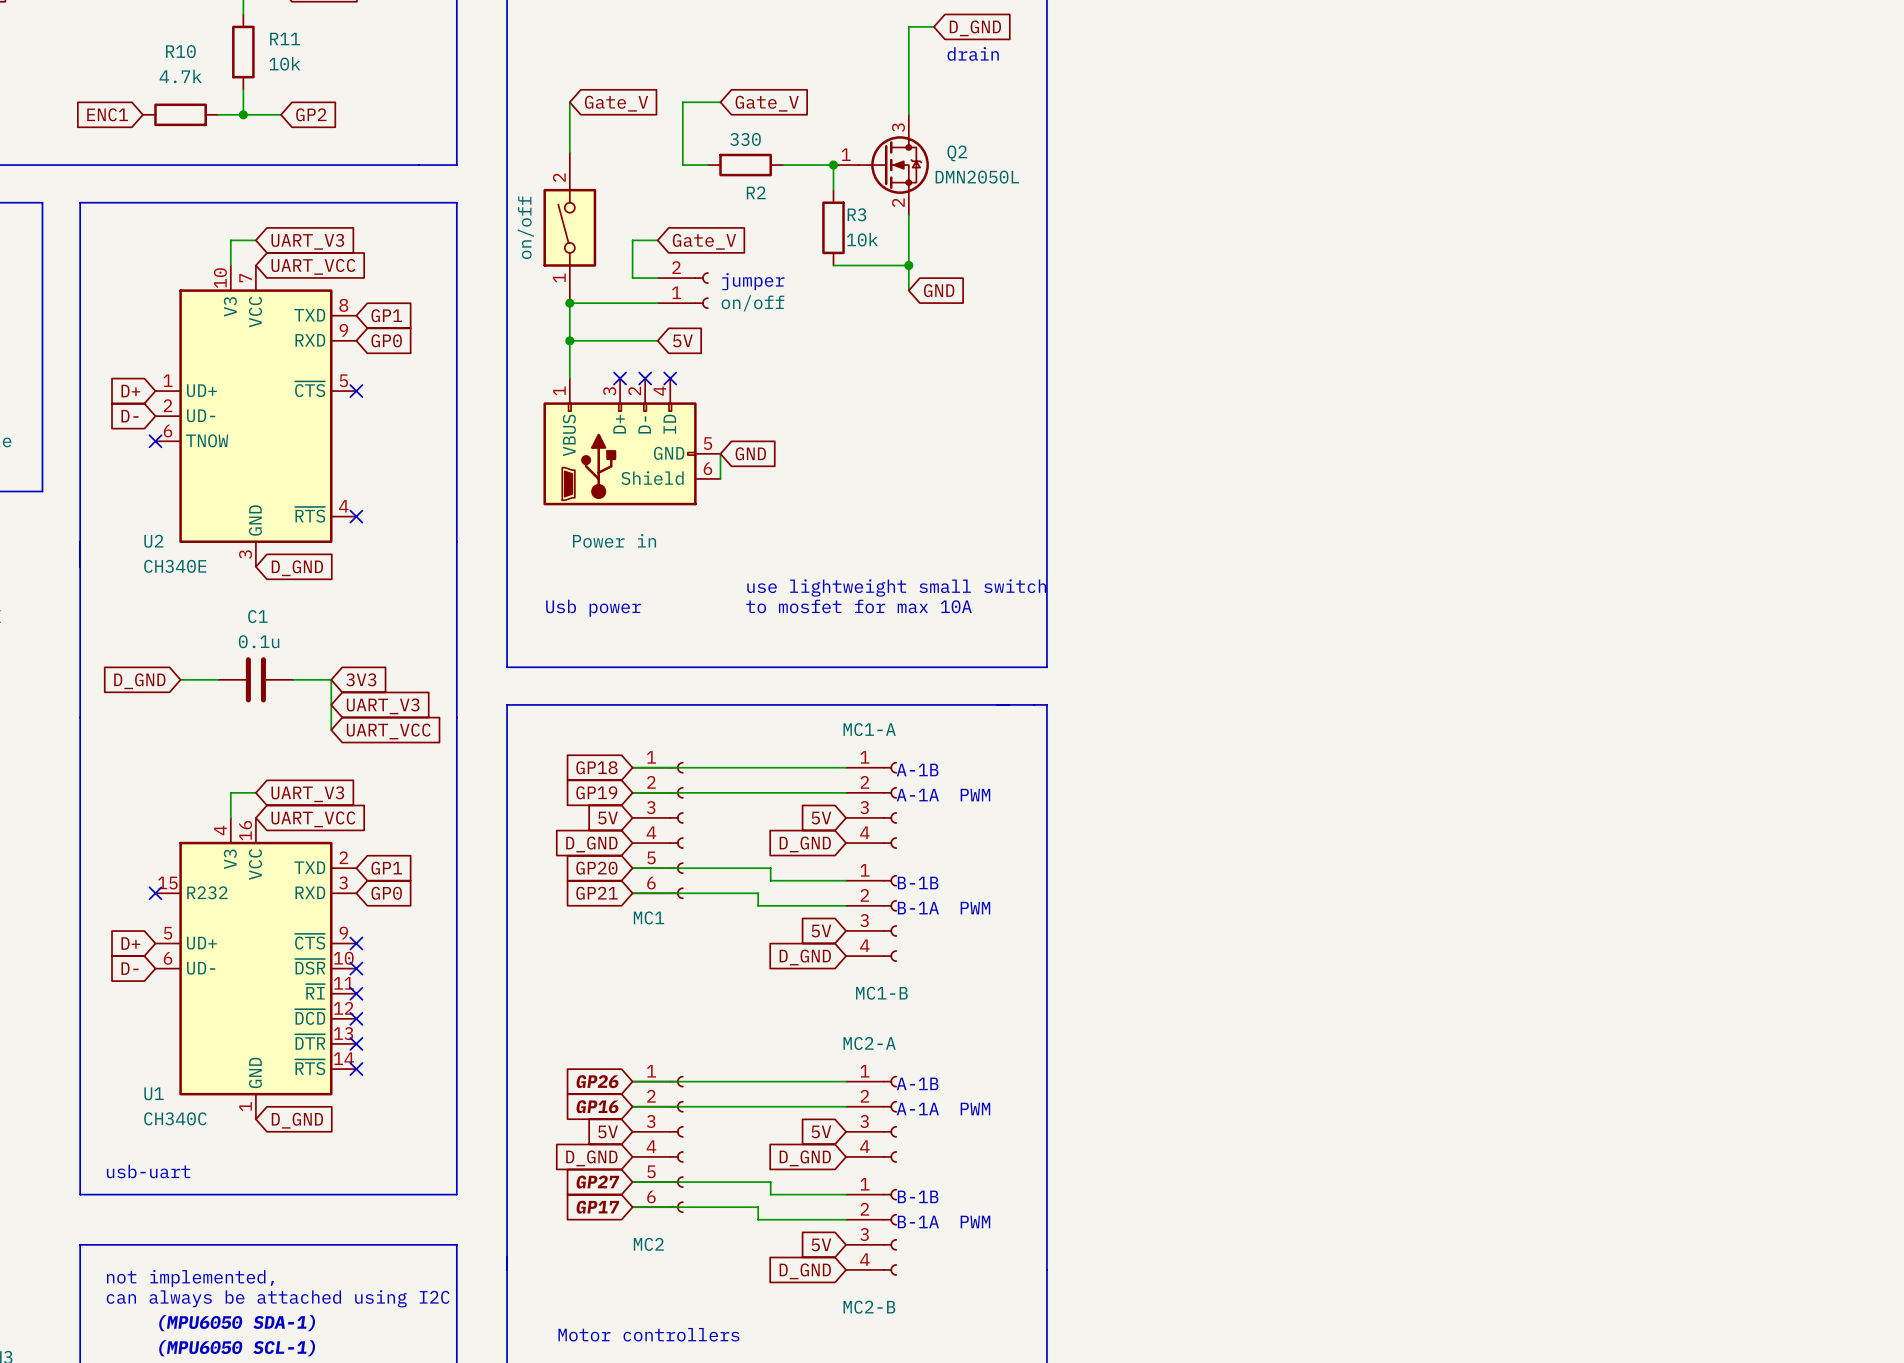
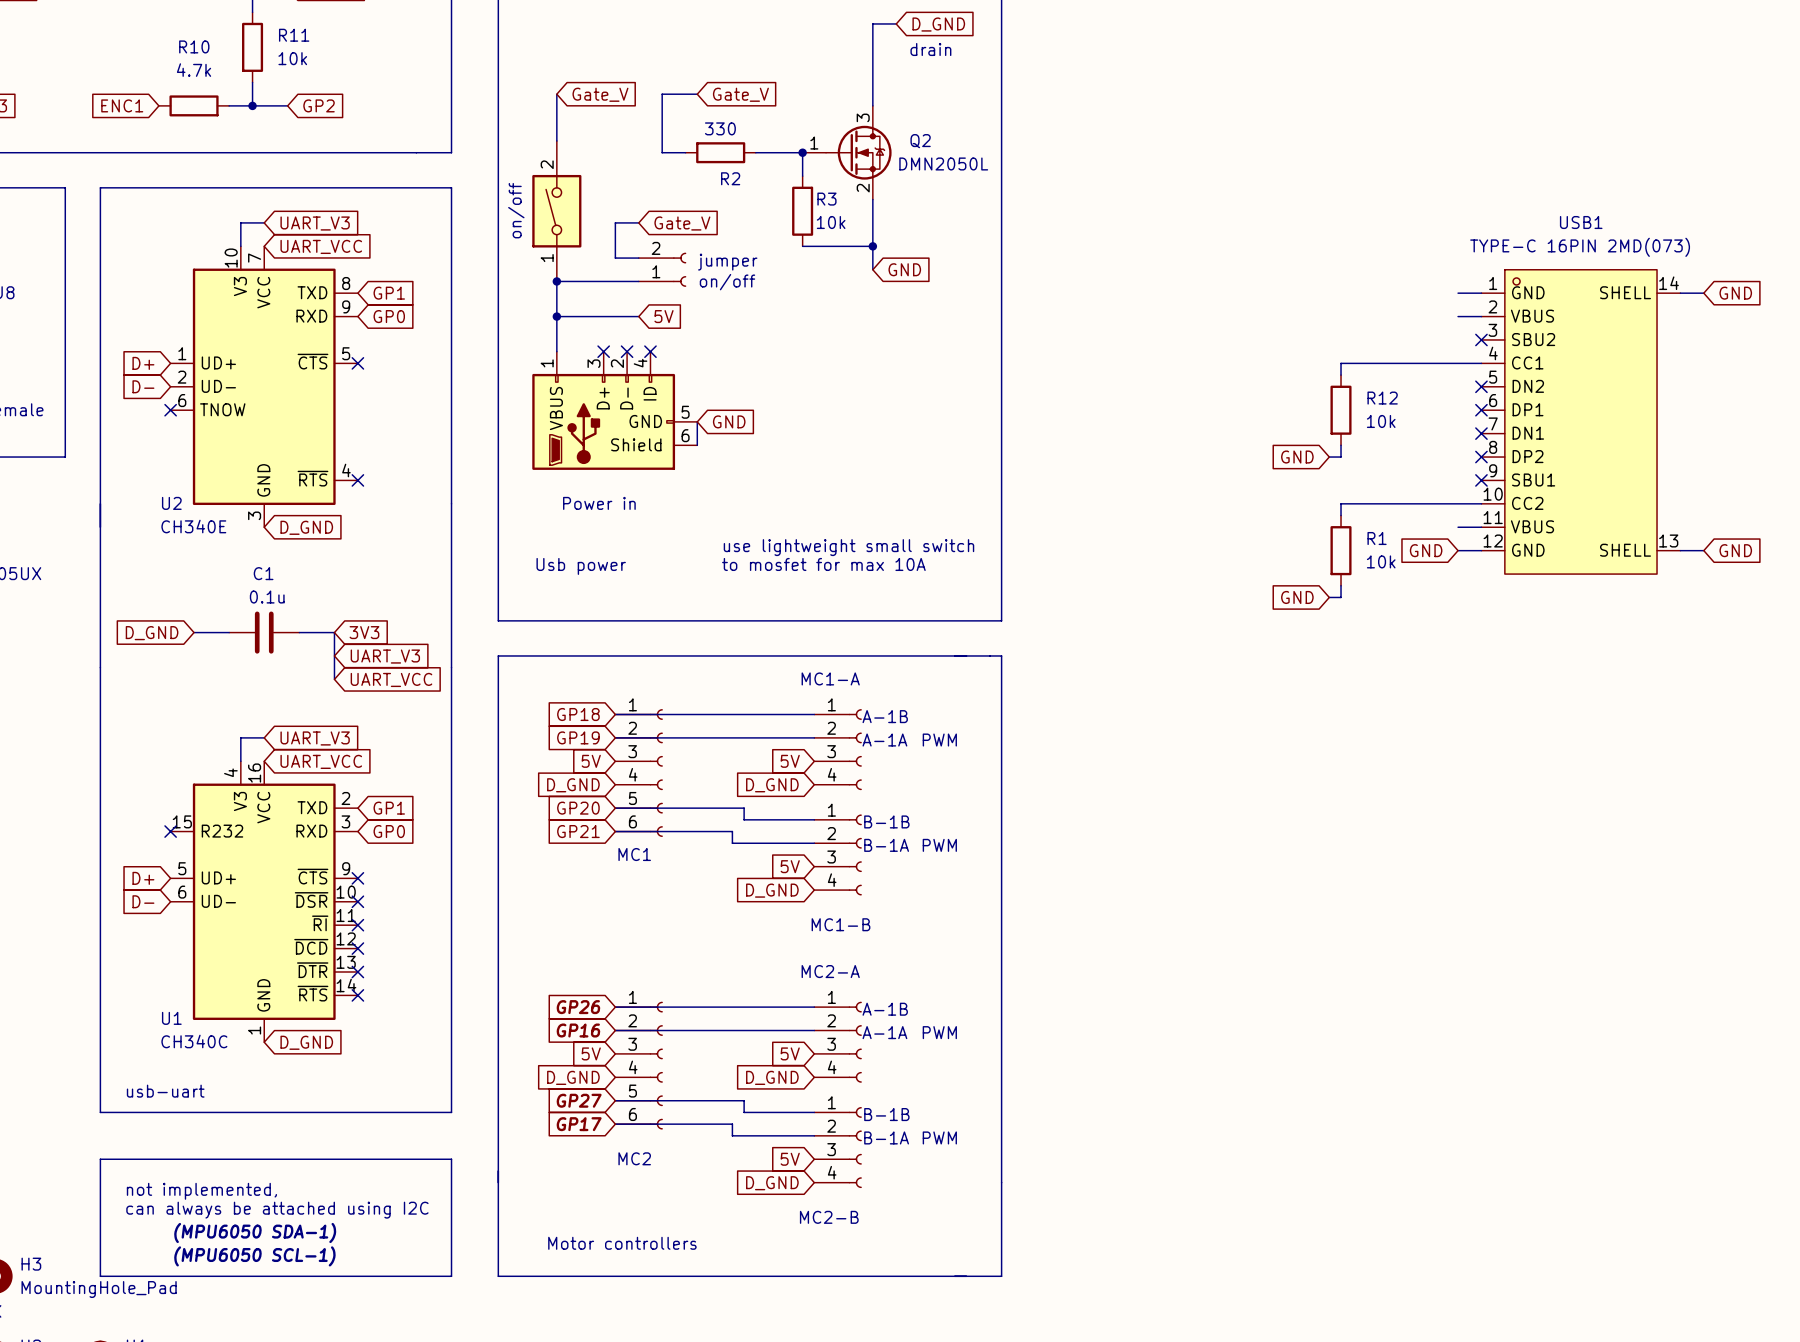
wire: none -> (1458, 293) (1481, 293)
wire: none -> (1680, 293) (1703, 293)
global label: none -> GND (1735, 293)
wire: none -> (1458, 316) (1481, 316)
no-connect mark: none -> (1481, 339)
wire: none -> (1481, 363) (1341, 363) (1341, 375)
no-connect mark: none -> (1481, 386)
R12: none -> 10k (1341, 410)
no-connect mark: none -> (1481, 410)
USB1: none -> TYPE-C 16PIN 2MD(073) (1580, 421)
no-connect mark: none -> (1481, 433)
wire: none -> (1341, 445) (1341, 457) (1329, 457)
global label: none -> GND (1297, 457)
no-connect mark: none -> (1481, 457)
no-connect mark: none -> (1481, 480)
wire: none -> (1481, 503) (1341, 503) (1341, 515)
wire: none -> (1458, 527) (1481, 527)
R1: none -> 10k (1341, 550)
global label: none -> GND (1426, 550)
wire: none -> (1458, 550) (1481, 550)
wire: none -> (1680, 550) (1703, 550)
global label: none -> GND (1735, 550)
wire: none -> (1341, 585) (1341, 597) (1329, 597)
global label: none -> GND (1297, 597)

